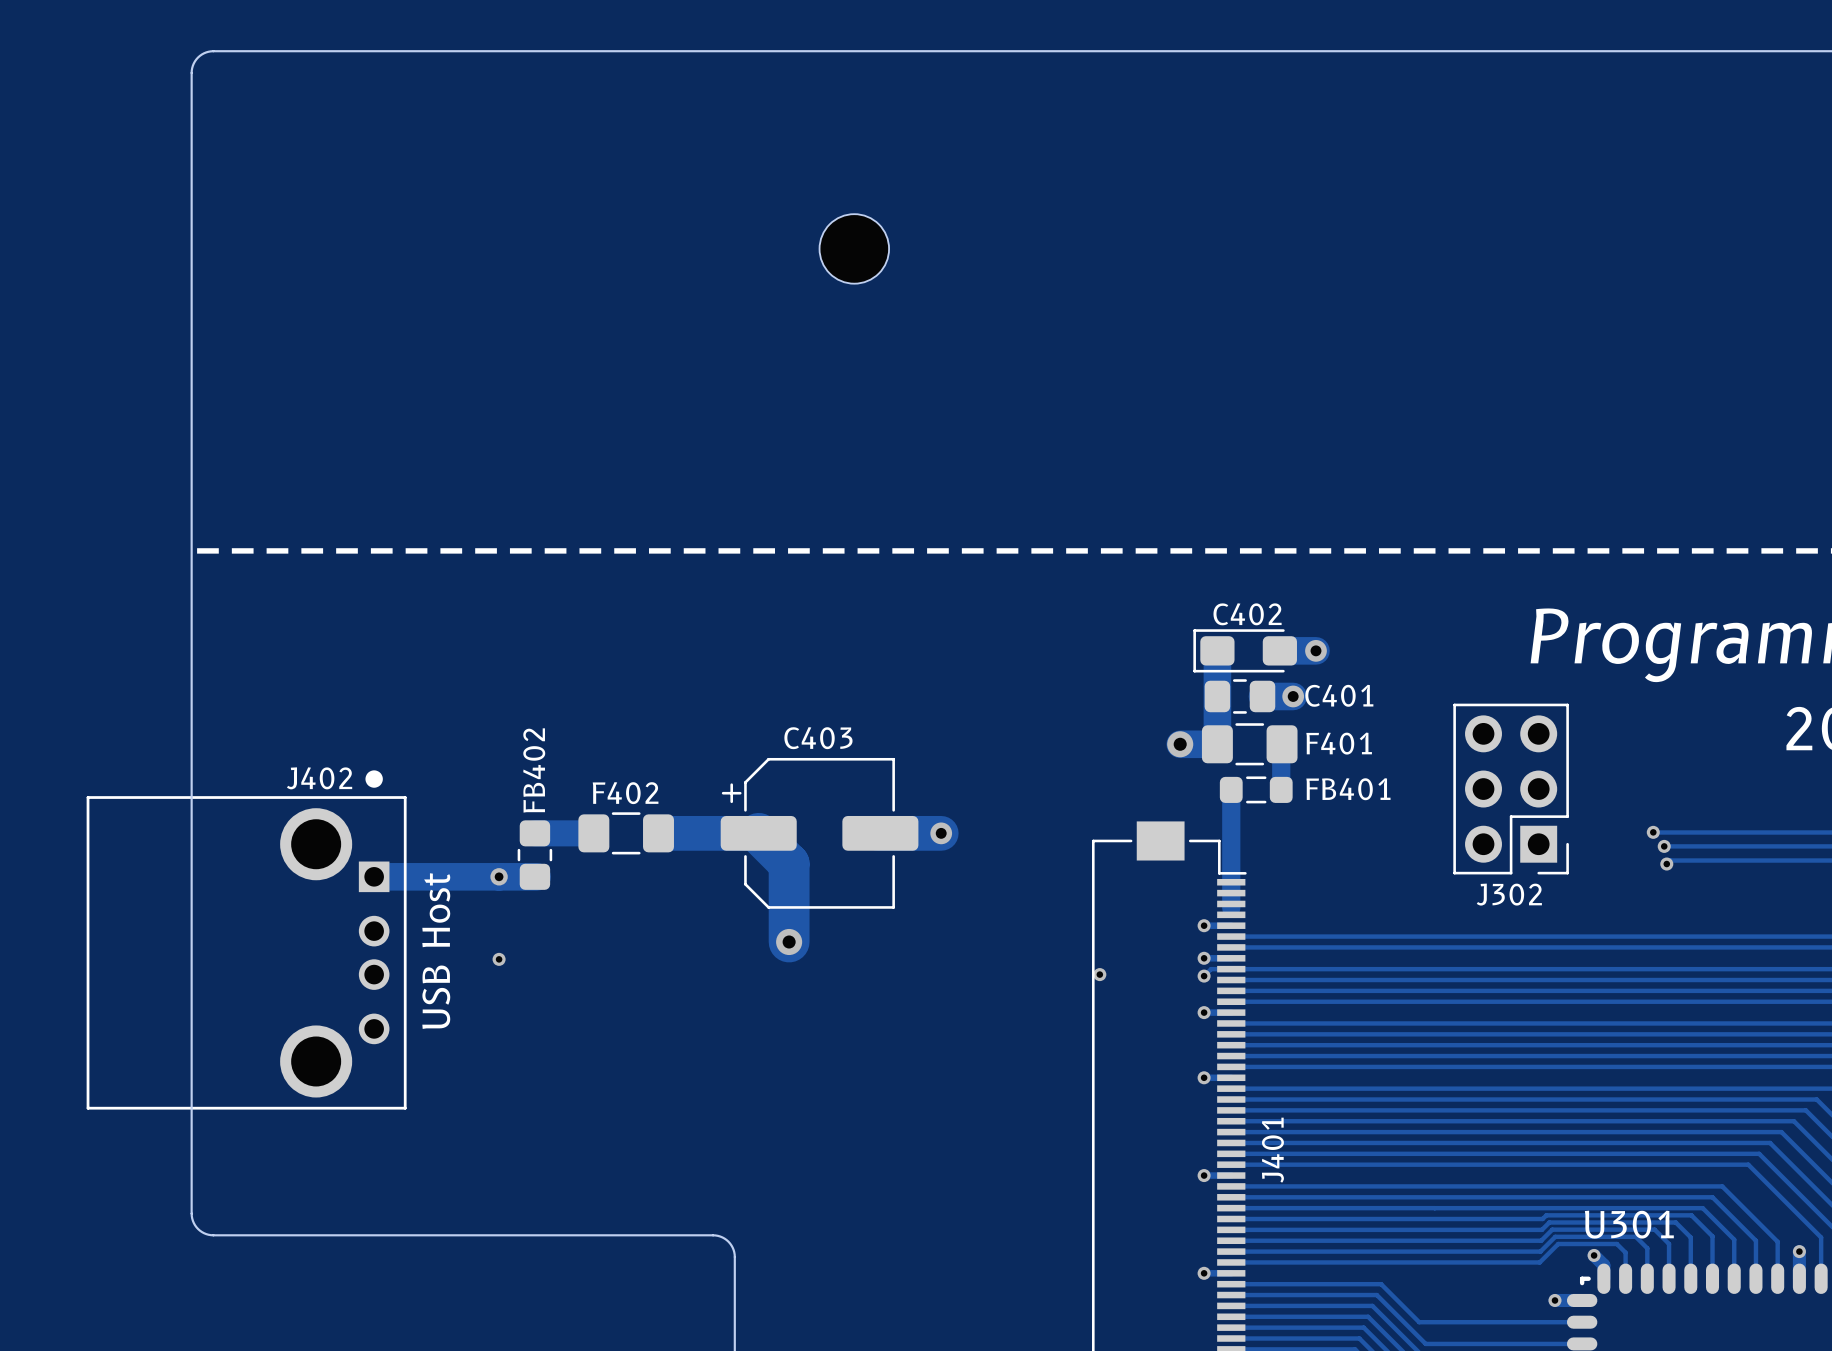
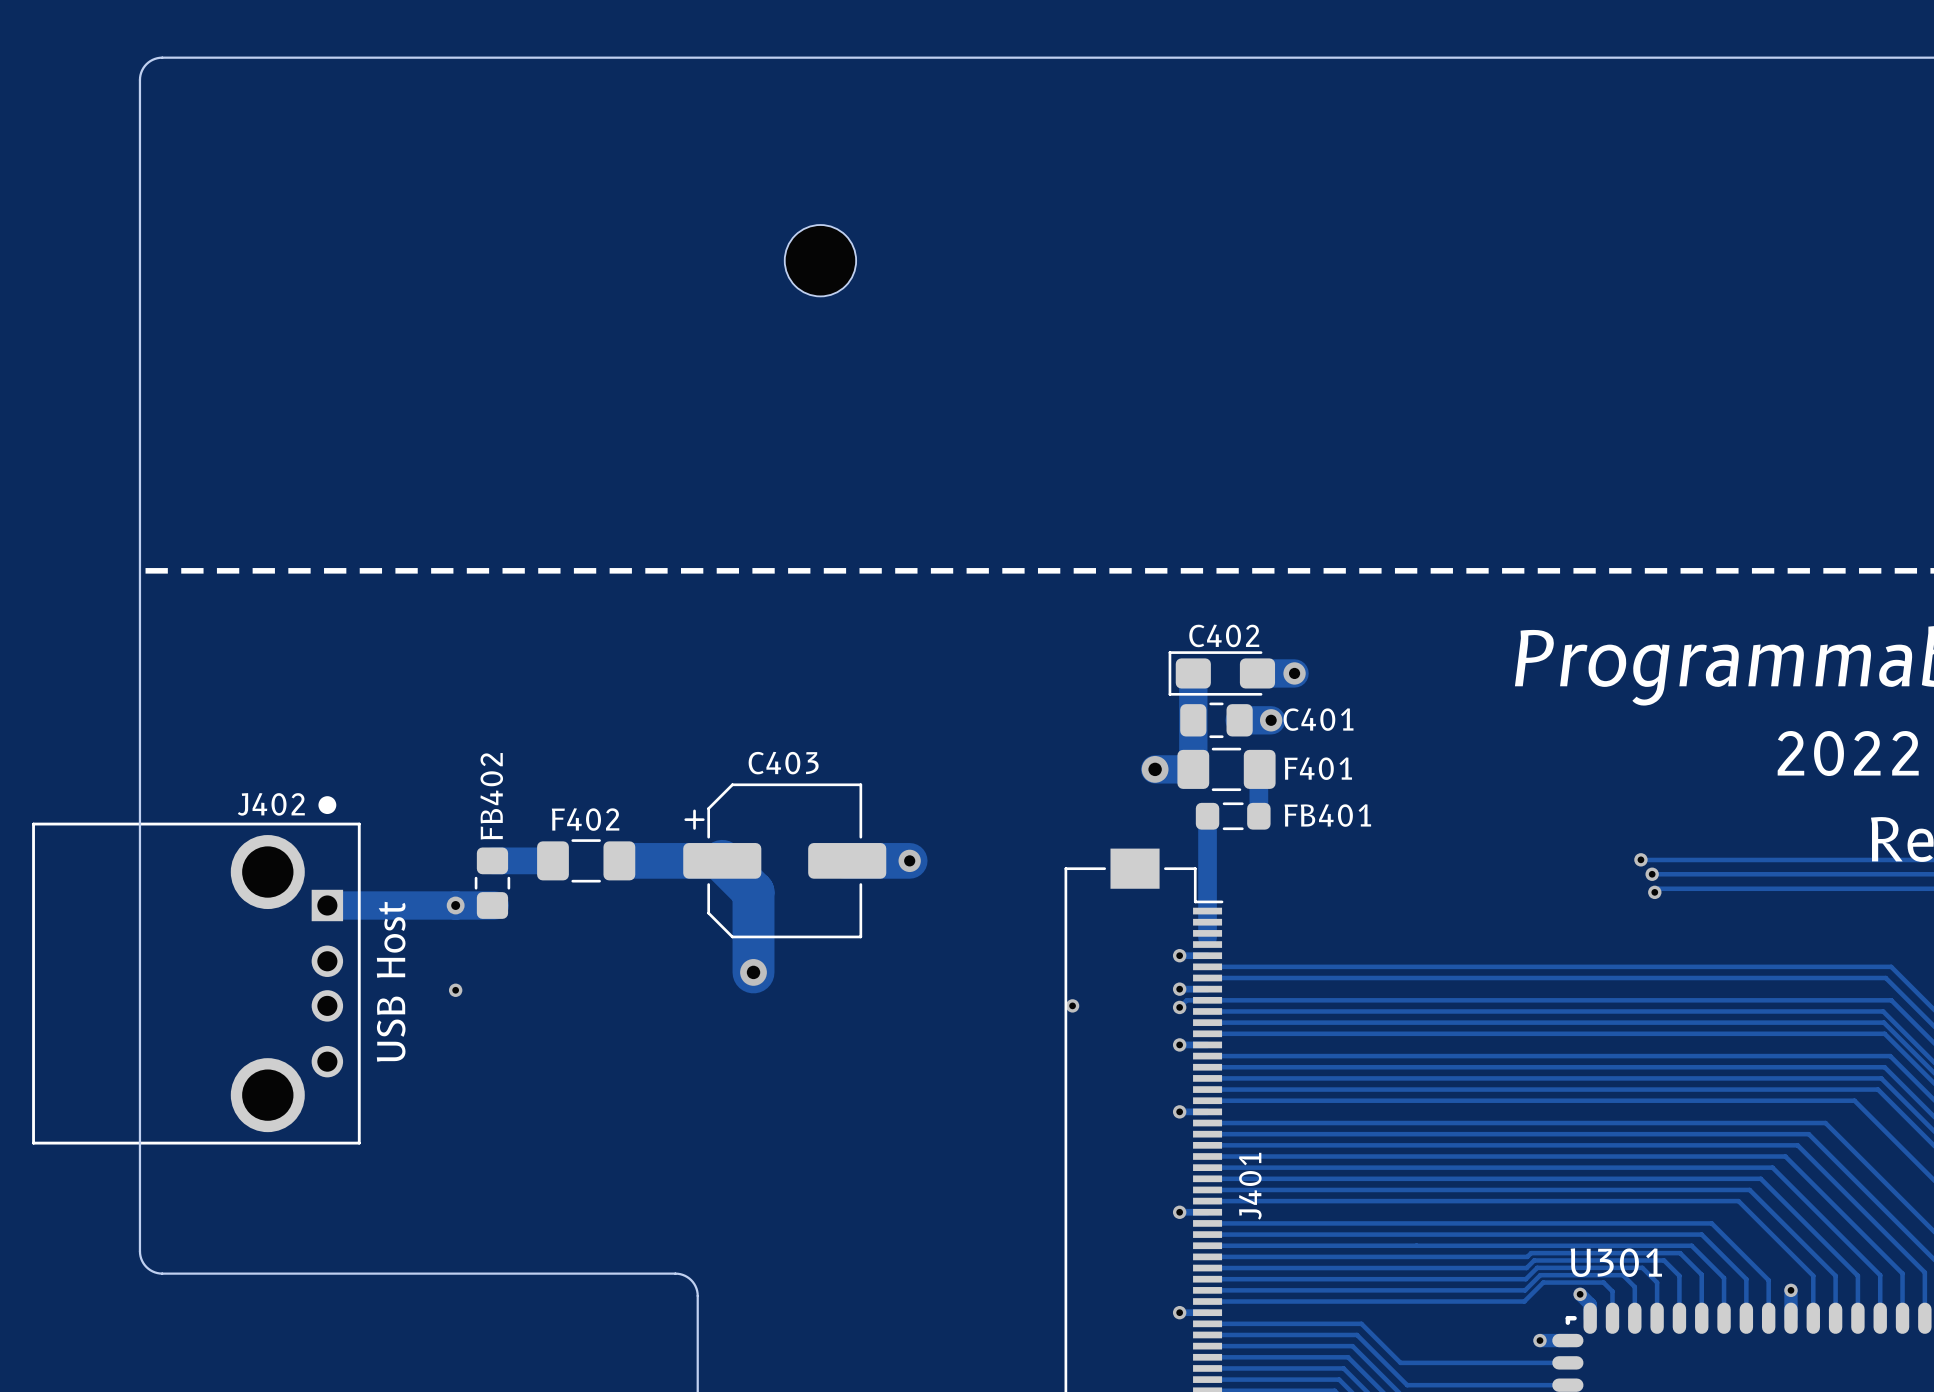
J302: (1511, 789) -> none

